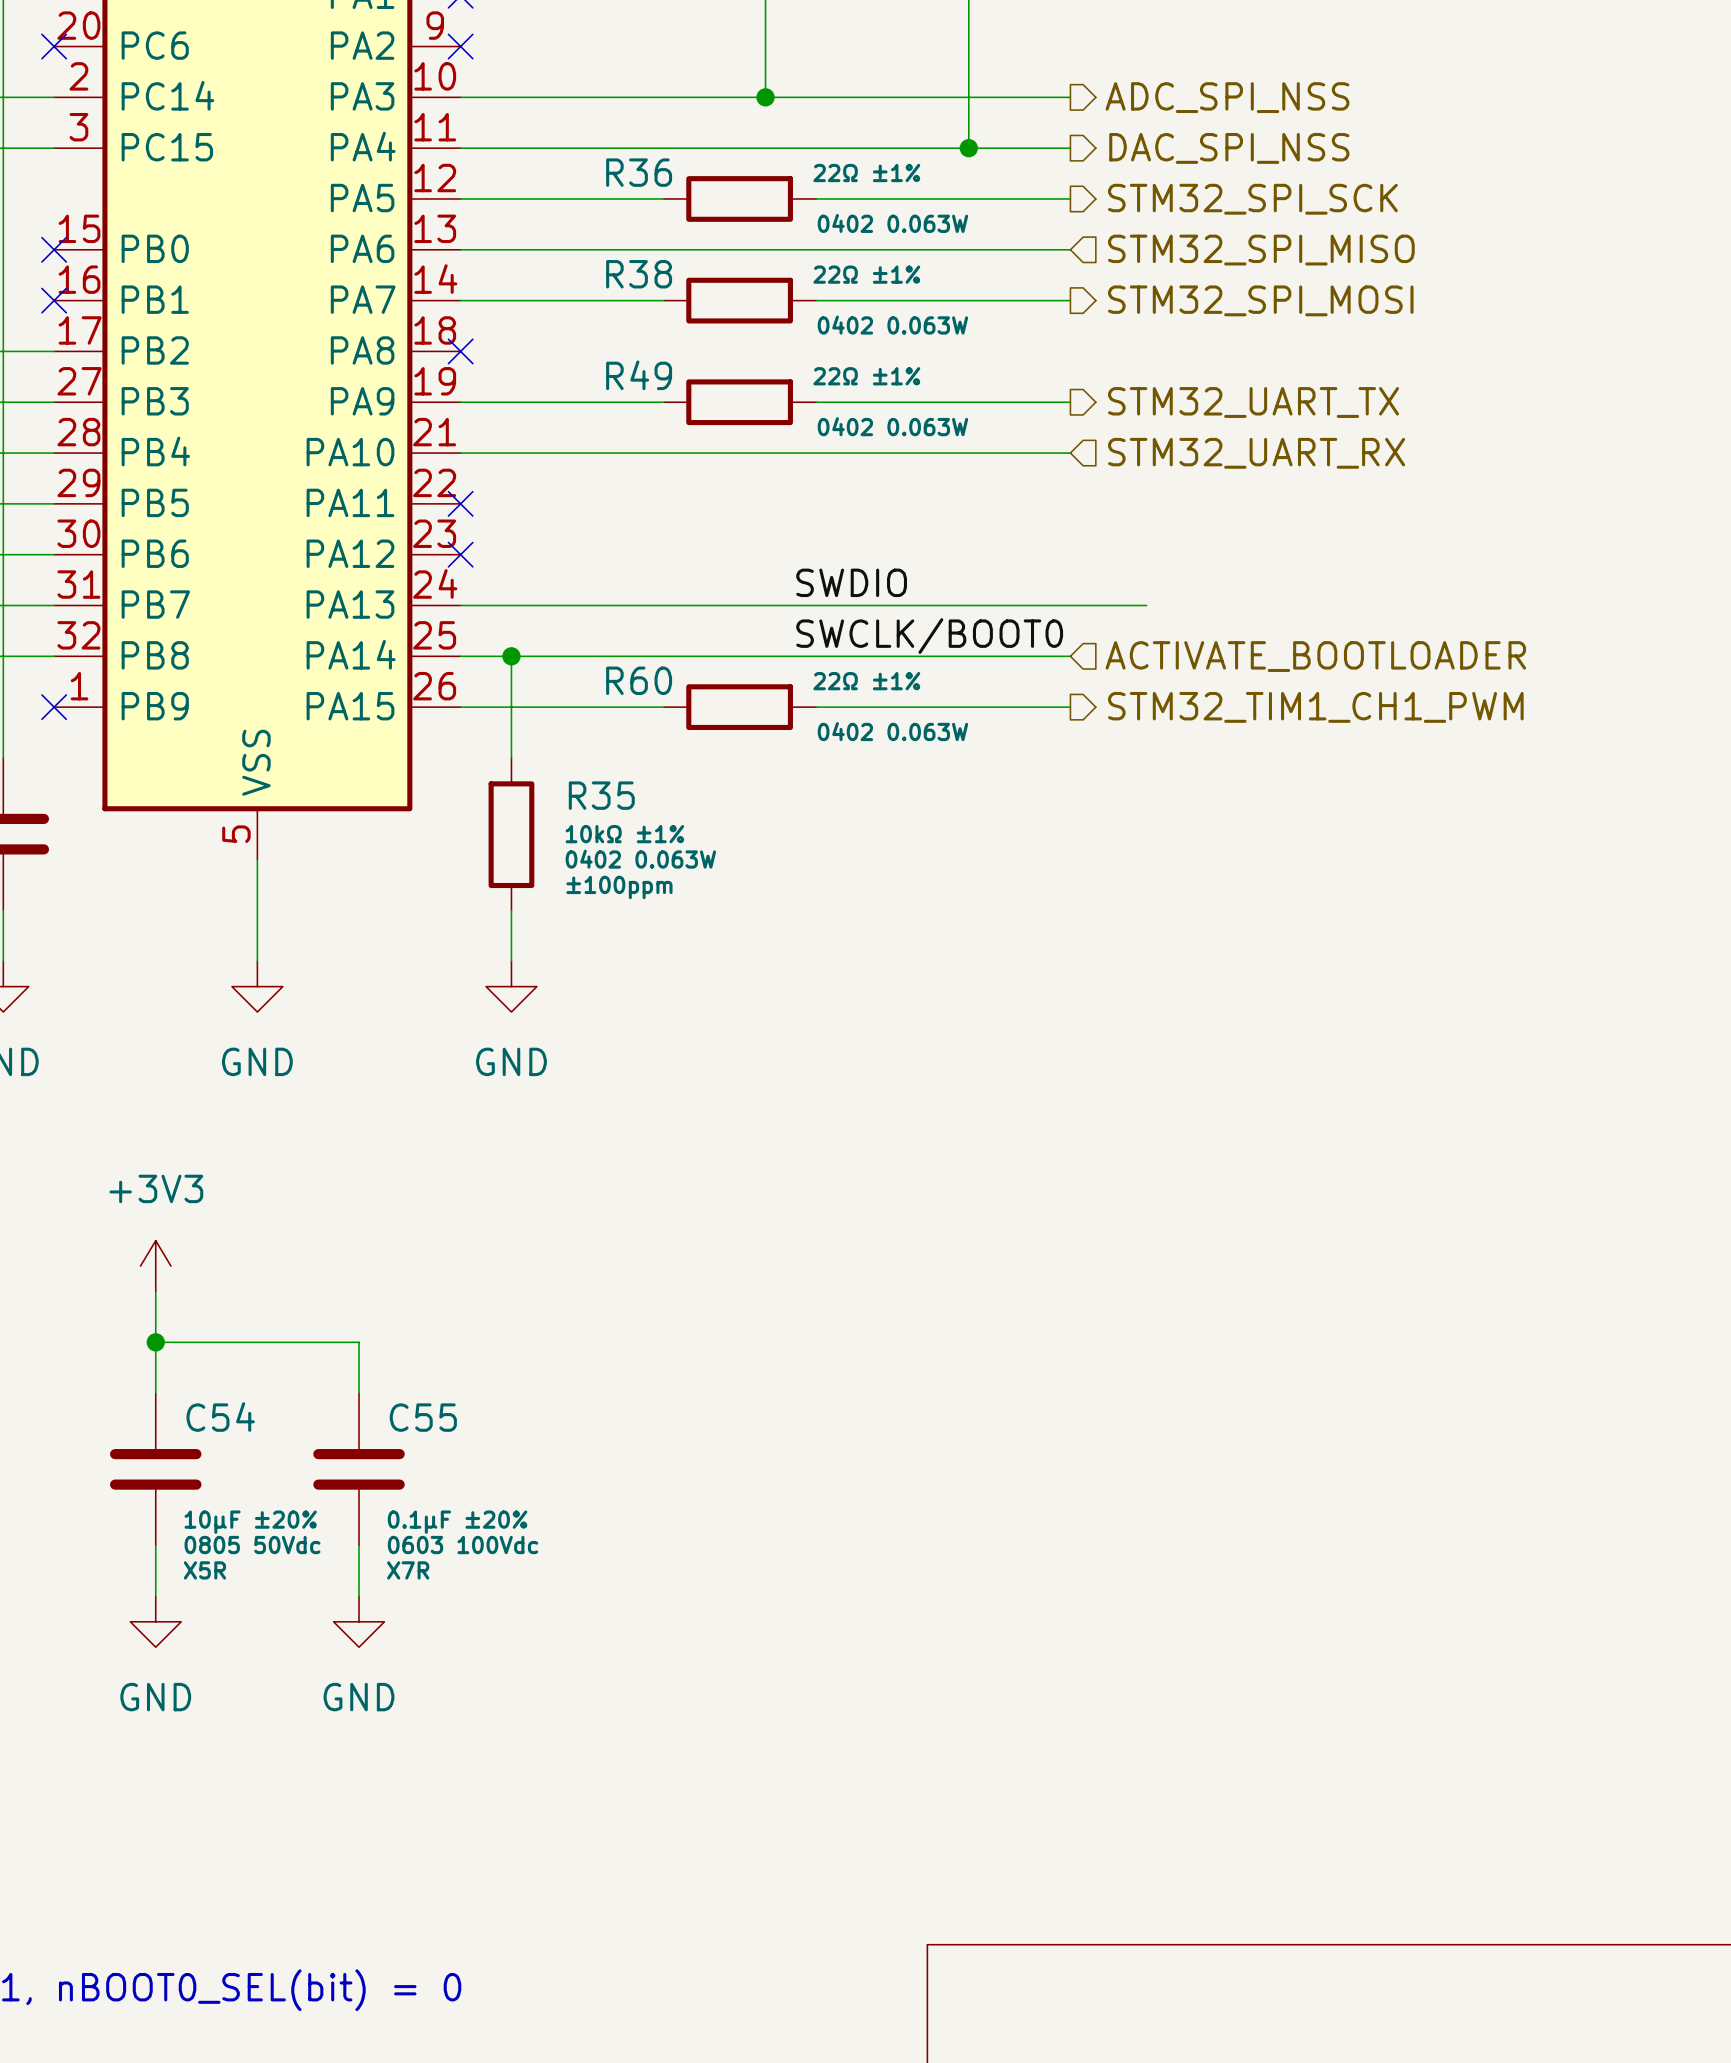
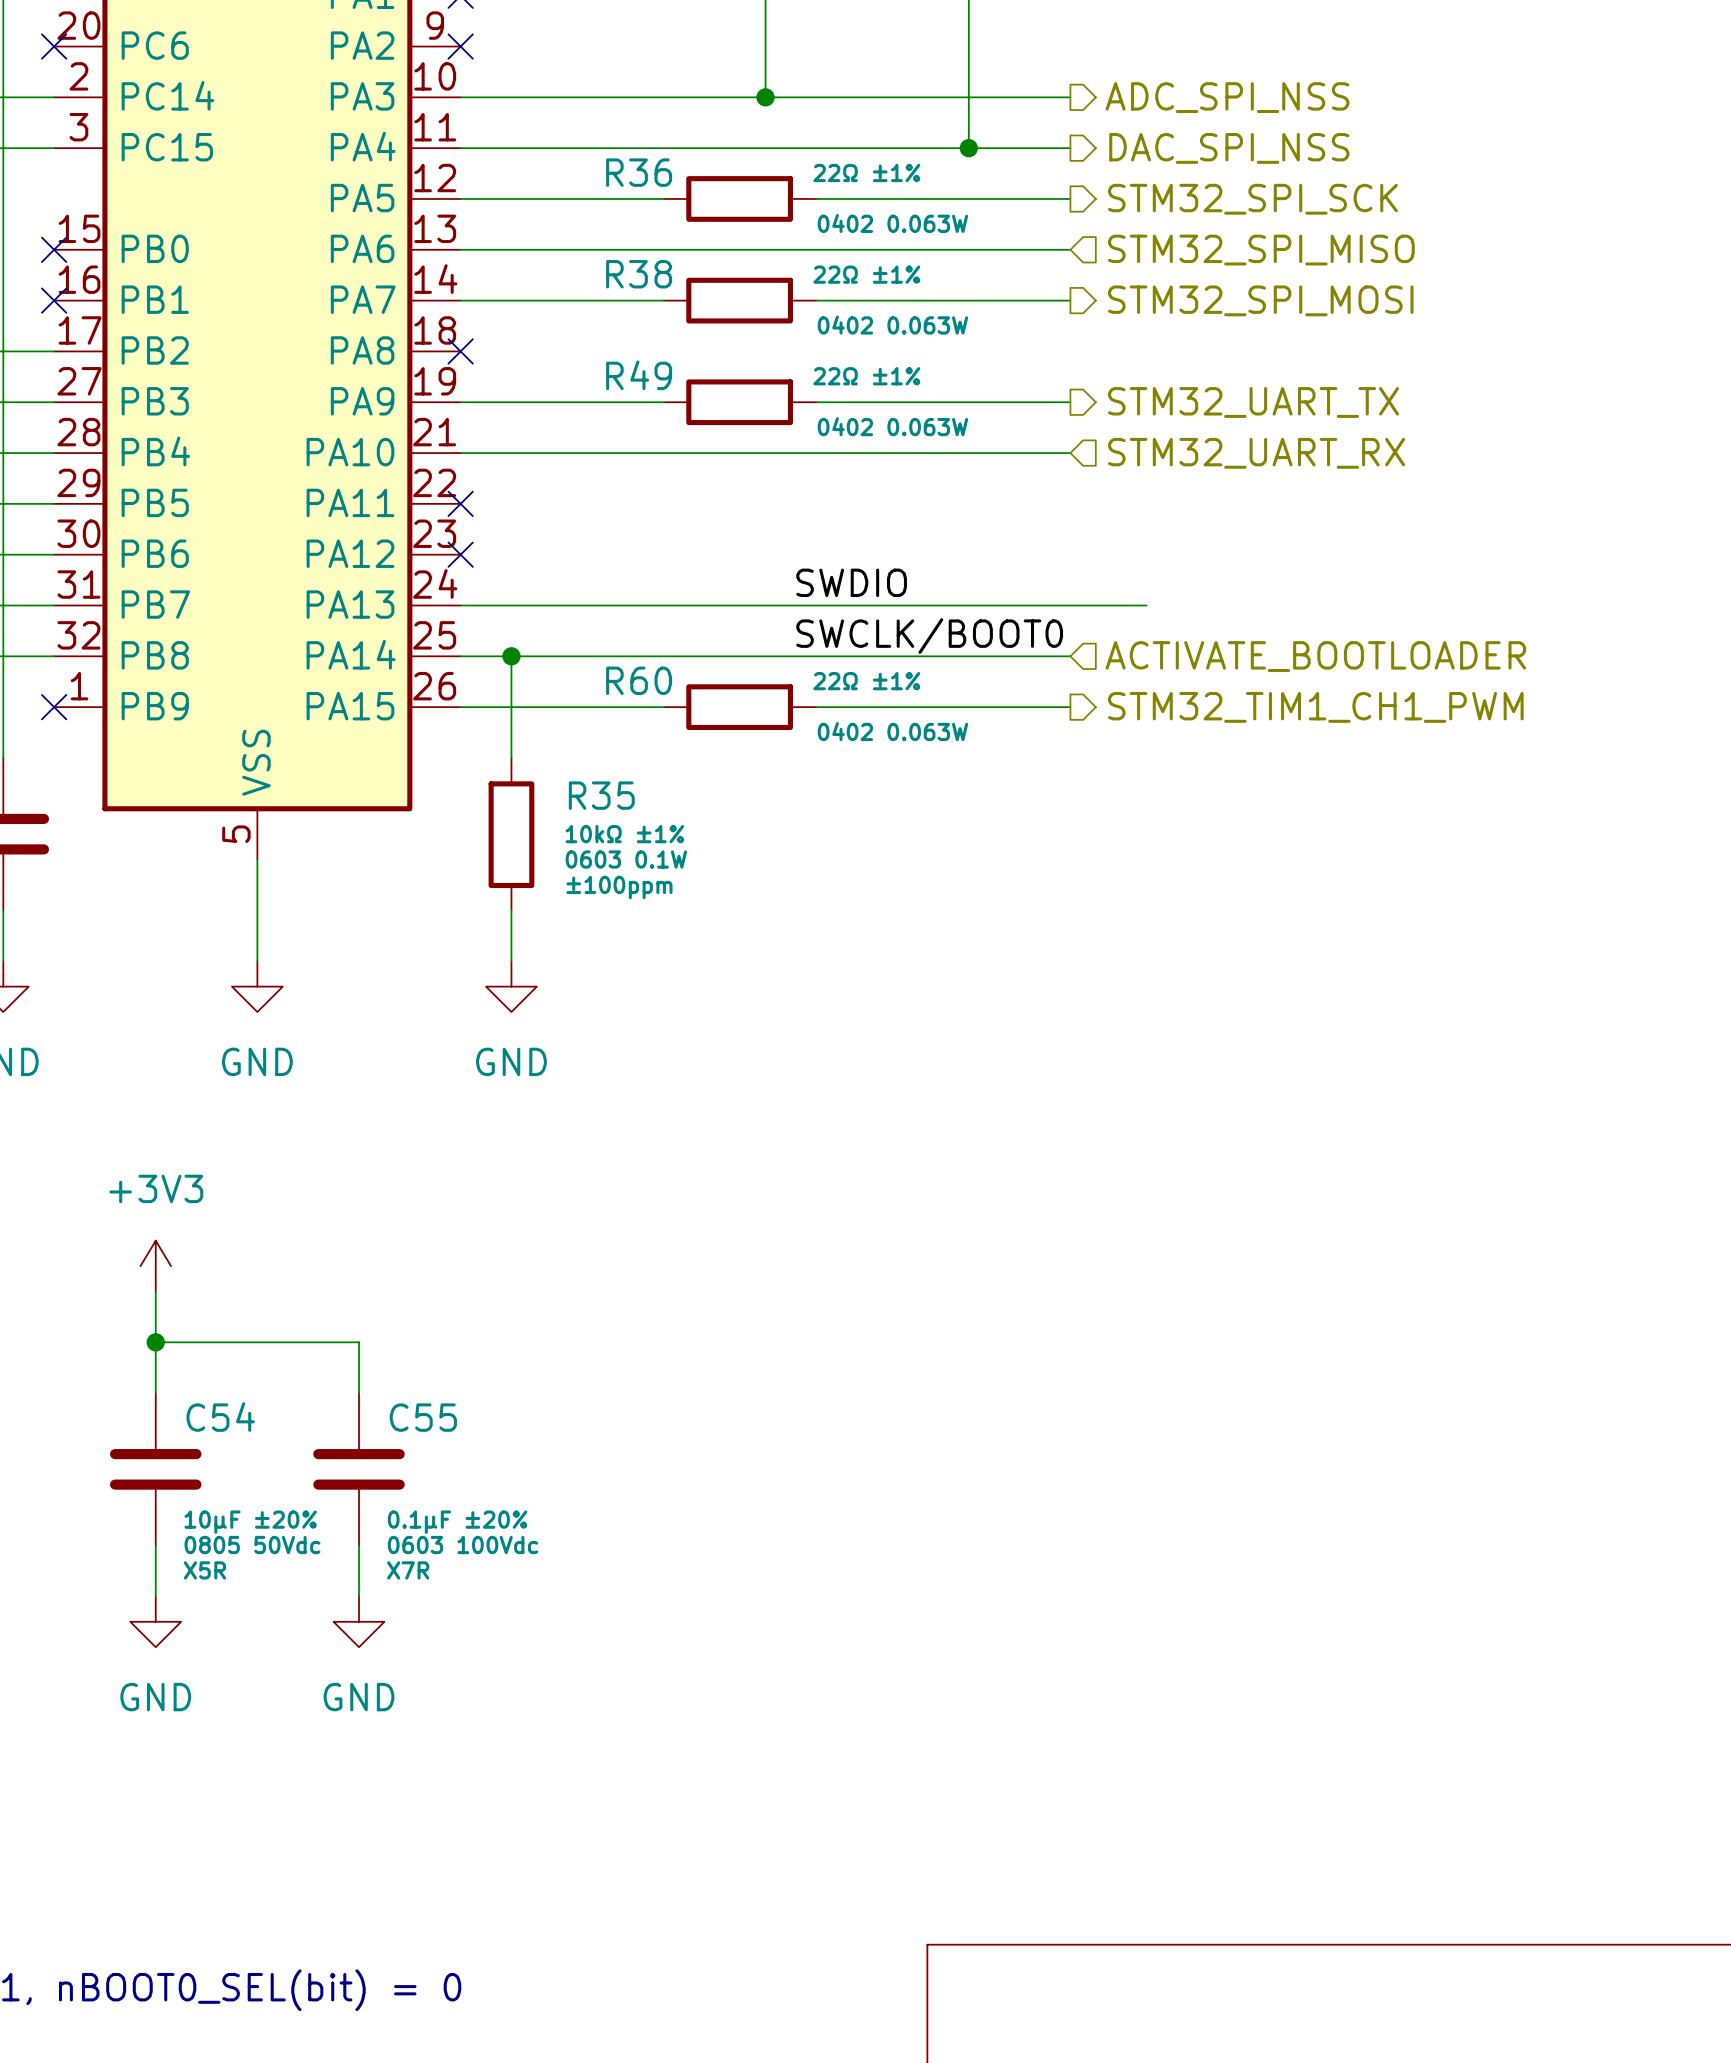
R35 text: 0402 0.063W (640, 859) -> 0603 0.1W (626, 859)

